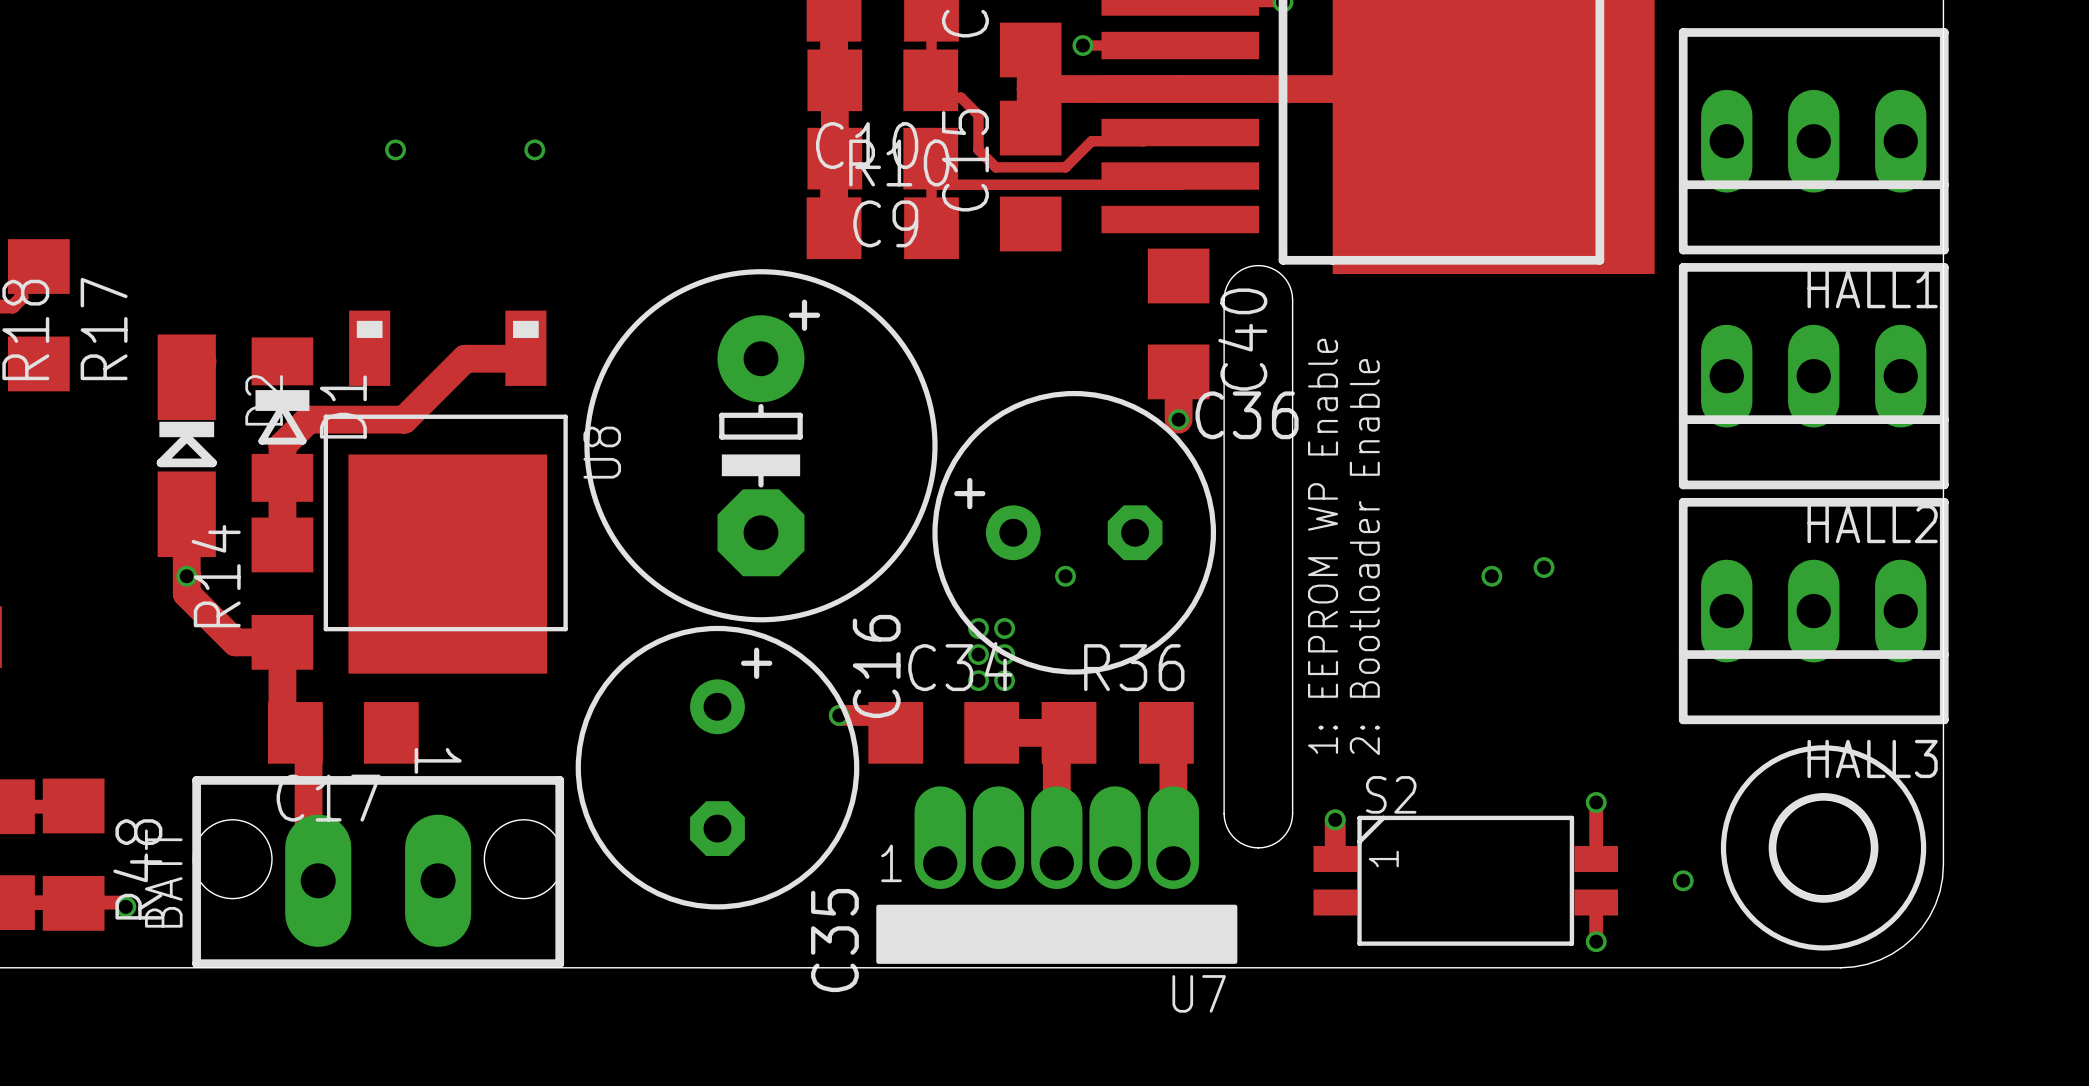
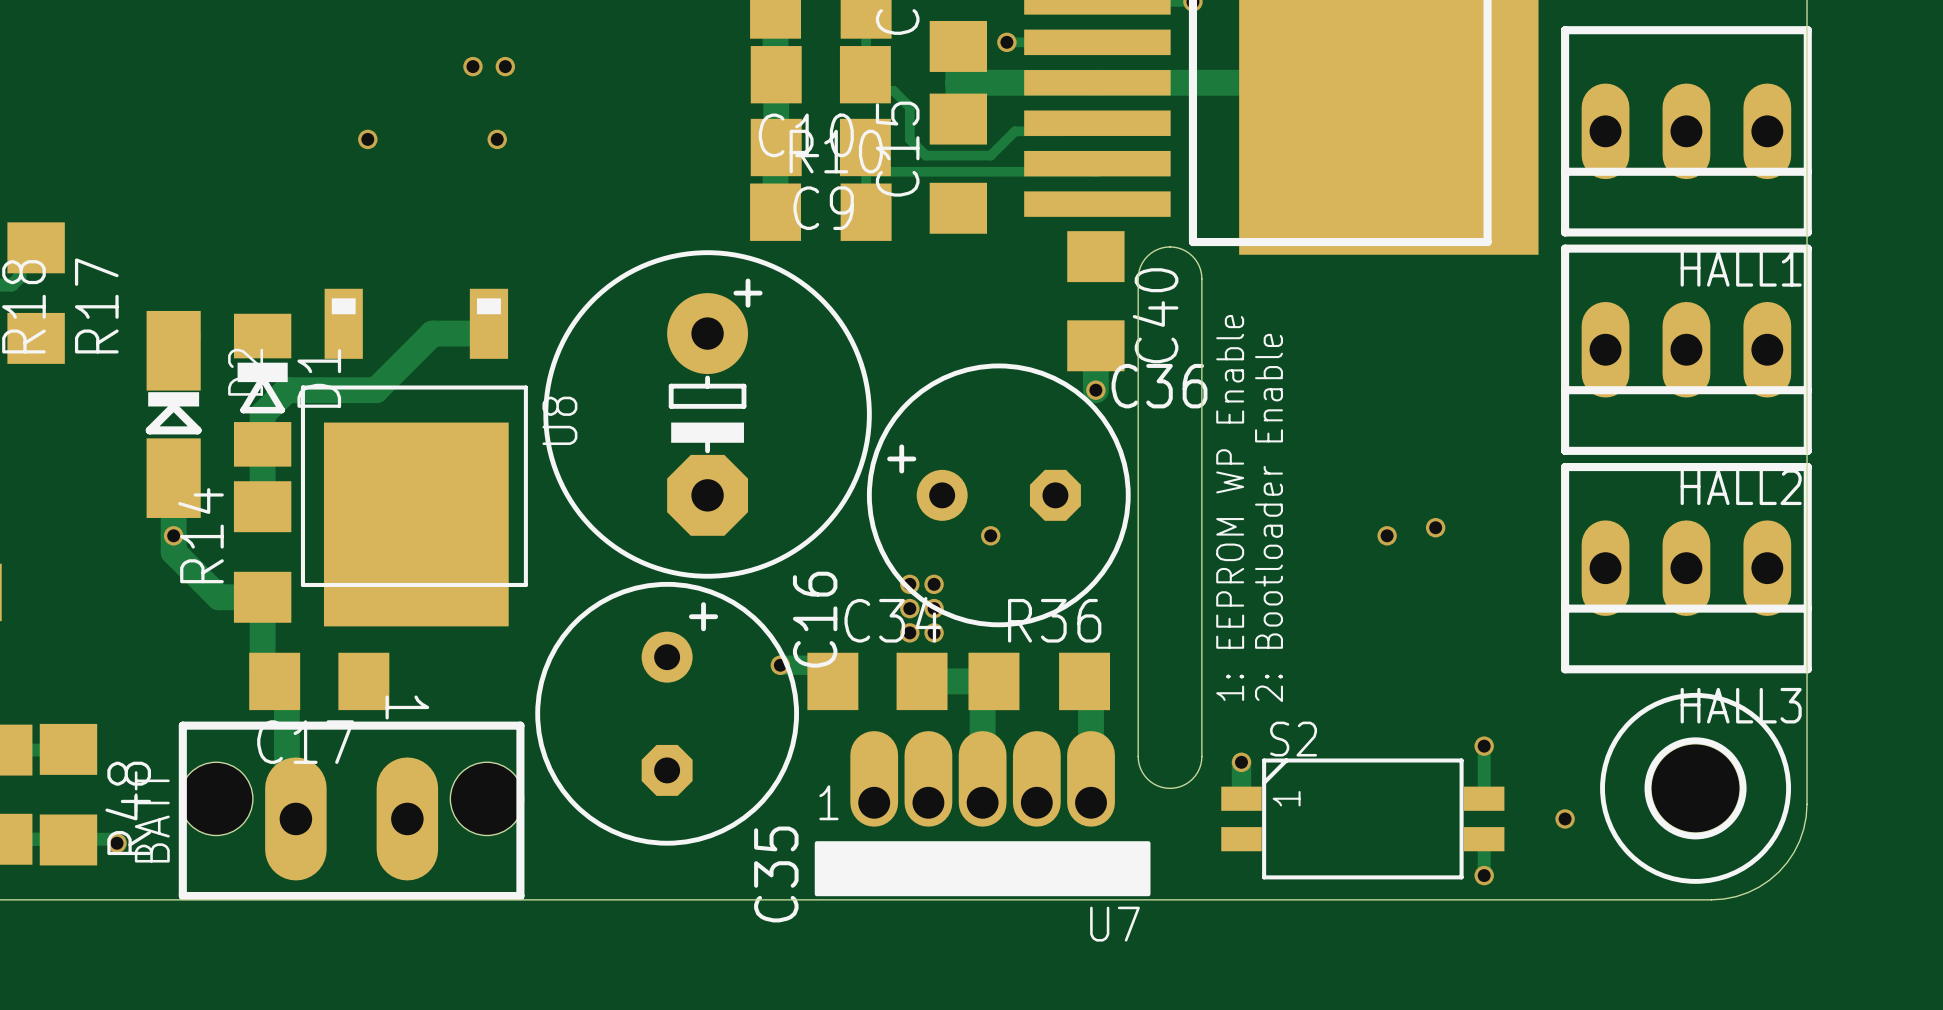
via: none -> (472, 66)
via: none -> (505, 66)

